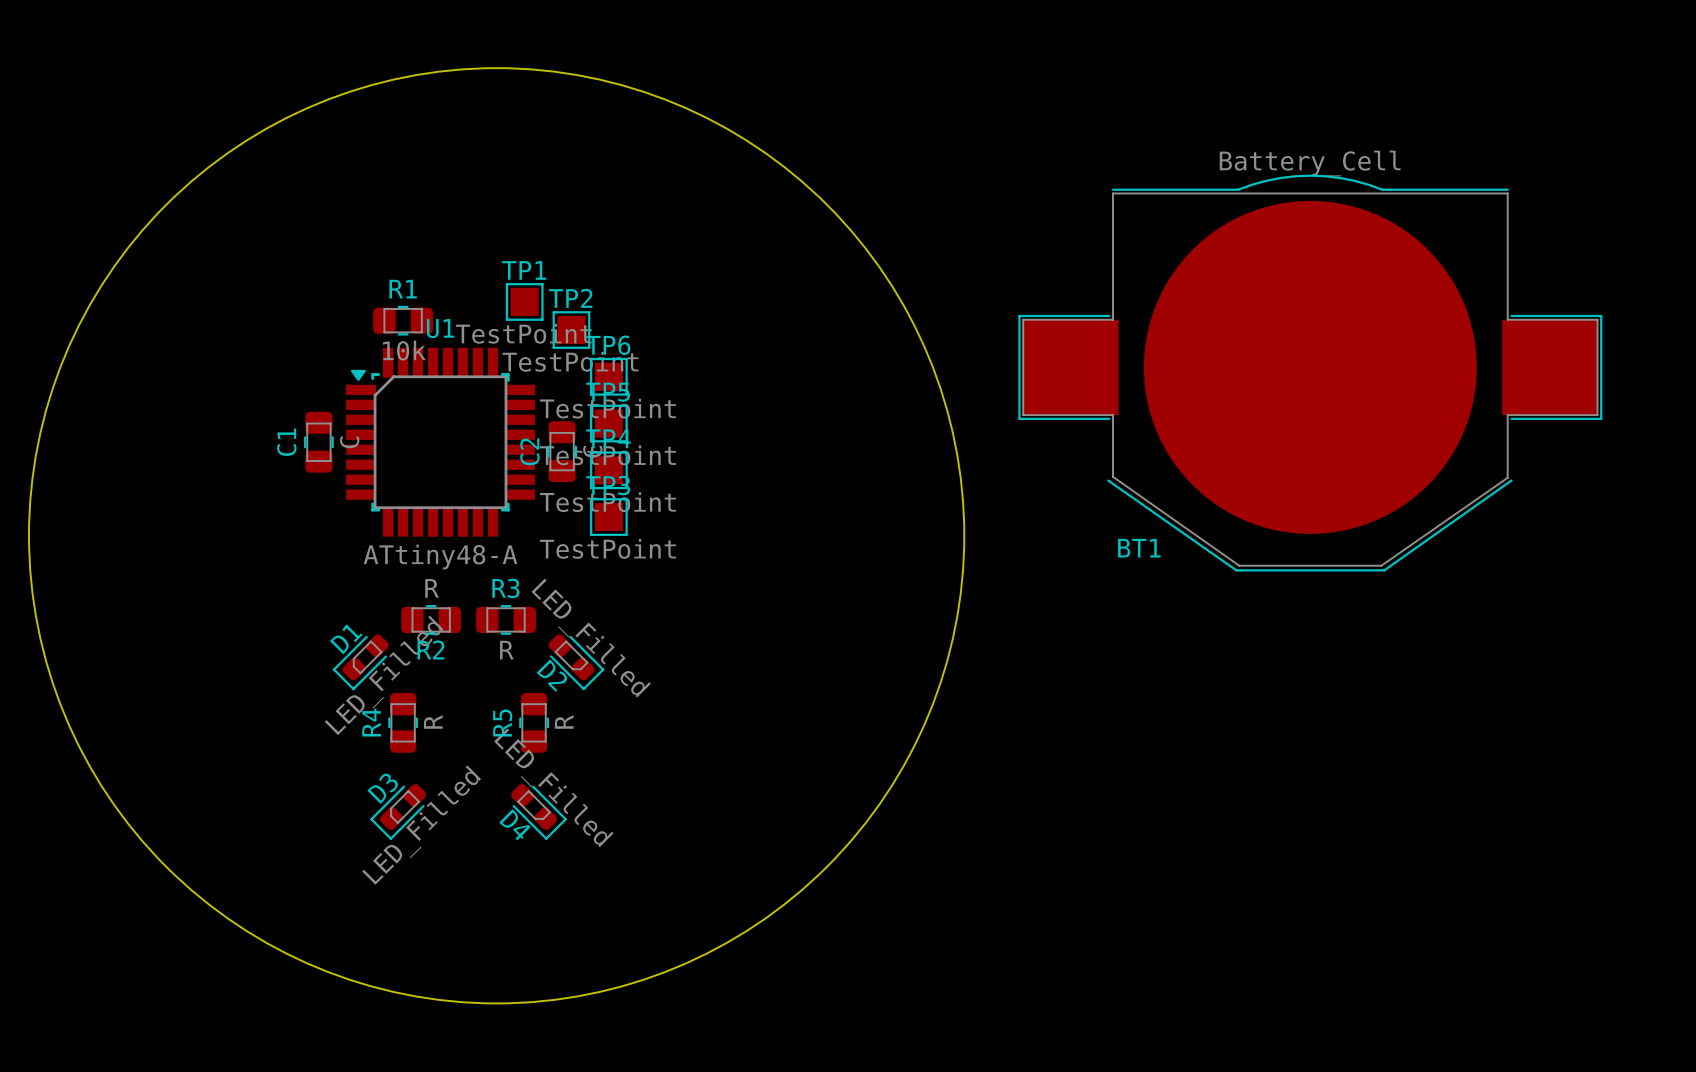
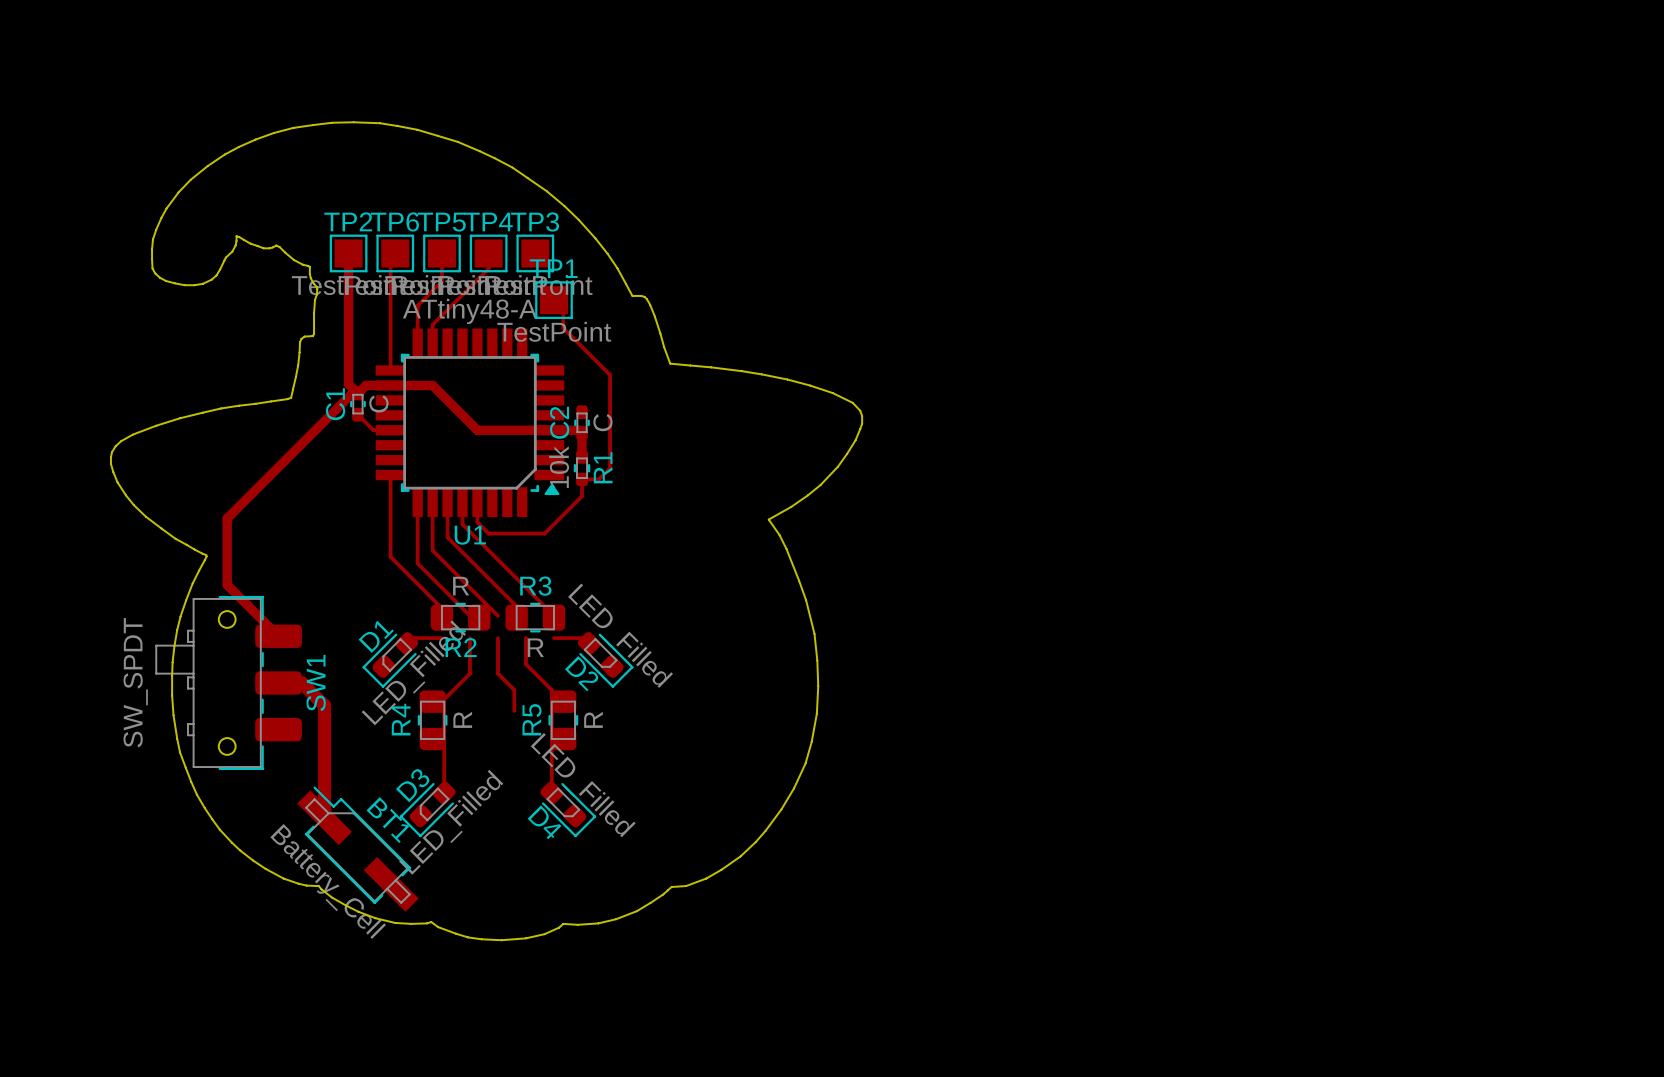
round board edge: [28, 67, 965, 1004] -> none
board edge: none -> (353, 122) (397, 126) (457, 141) (512, 167) (547, 191) (578, 219) (595, 238) (617, 268) (632, 295) (641, 295) (646, 299) (654, 316) (670, 363) (741, 371) (810, 385) (832, 393) (852, 402) (862, 415) (862, 423) (855, 440) (837, 466) (807, 495) (768, 519) (786, 548) (806, 600) (814, 633) (817, 660) (816, 713) (805, 763) (793, 788) (765, 830) (740, 856) (706, 878) (686, 886) (671, 887) (636, 911) (616, 919) (598, 923) (563, 923) (544, 934) (526, 938) (501, 940) (468, 937) (438, 927) (431, 922) (395, 922) (358, 911) (332, 897) (318, 886) (306, 885) (283, 878) (265, 868) (240, 850) (219, 829) (204, 808) (196, 794) (180, 752) (172, 695) (174, 646) (186, 600) (206, 556) (175, 538) (133, 505) (117, 482) (110, 464) (111, 452) (121, 441) (132, 434) (180, 418) (221, 408) (291, 397) (298, 365) (300, 342) (304, 336) (314, 334) (314, 300) (317, 288) (310, 278) (309, 267) (293, 260) (279, 246) (276, 245) (263, 248) (236, 236) (235, 245) (232, 251) (225, 257) (216, 275) (211, 279) (194, 285) (166, 281) (155, 273) (152, 268) (152, 239) (161, 217) (178, 192) (190, 179) (224, 154) (255, 139) (293, 127) (332, 122) (353, 122)
BT1 value position: Battery_Cell (1310, 163) -> Battery_Cell (328, 881)
BT1 footprint: [1018, 174, 1603, 572] -> [297, 786, 419, 912]
track: none -> (348, 253) (348, 384) (357, 393)
track: none -> (395, 253) (390, 258) (390, 370)
track: none -> (441, 253) (441, 281) (417, 305) (417, 343)
track: none -> (488, 253) (488, 268) (432, 324) (432, 343)
R1 name position: R1 (403, 289) -> R1 (603, 467)
track: none -> (563, 300) (563, 328) (610, 374) (610, 468) (598, 479) (582, 479) (582, 496) (544, 533) (488, 533) (477, 522) (477, 502)
R1 footprint: [373, 305, 434, 336] -> [573, 450, 591, 487]
TP2 position: (571, 330) -> (348, 253)
R1 value position: 10k (404, 350) -> 10k (559, 467)
TP6 position: (608, 376) -> (395, 253)
track: none -> (357, 393) (352, 393) (227, 518) (227, 584) (278, 636)
track: none -> (357, 393) (366, 385) (432, 385) (477, 430) (578, 430) (582, 433) (582, 457)
C1 footprint: [304, 411, 334, 473] -> [350, 386, 366, 422]
track: none -> (357, 414) (373, 430) (390, 430)
C2 footprint: [547, 421, 577, 483] -> [574, 405, 590, 441]
TP5 position: (608, 423) -> (441, 253)
U1 rotation: 0° (440, 442) -> 180° (469, 422)
TP4 position: (608, 470) -> (488, 253)
track: none -> (390, 475) (390, 556) (441, 608) (441, 615)
track: none -> (417, 502) (417, 563) (469, 615)
track: none -> (432, 502) (432, 550) (497, 615)
track: none -> (447, 502) (447, 537) (526, 615)
track: none -> (462, 502) (462, 524) (554, 615)
TP3 position: (608, 517) -> (535, 253)
BT1 name position: BT1 (1139, 548) -> BT1 (387, 820)
track: none -> (441, 638) (412, 638) (406, 643)
track: none -> (469, 638) (469, 673) (444, 699) (444, 792)
track: none -> (497, 638) (497, 673) (514, 689) (514, 710)
track: none -> (526, 638) (526, 664) (551, 690) (551, 792)
track: none -> (554, 638) (583, 638) (589, 643)
SW1: none -> SW_SPDT (228, 682)
track: none -> (278, 682) (301, 682) (324, 705) (324, 817)

